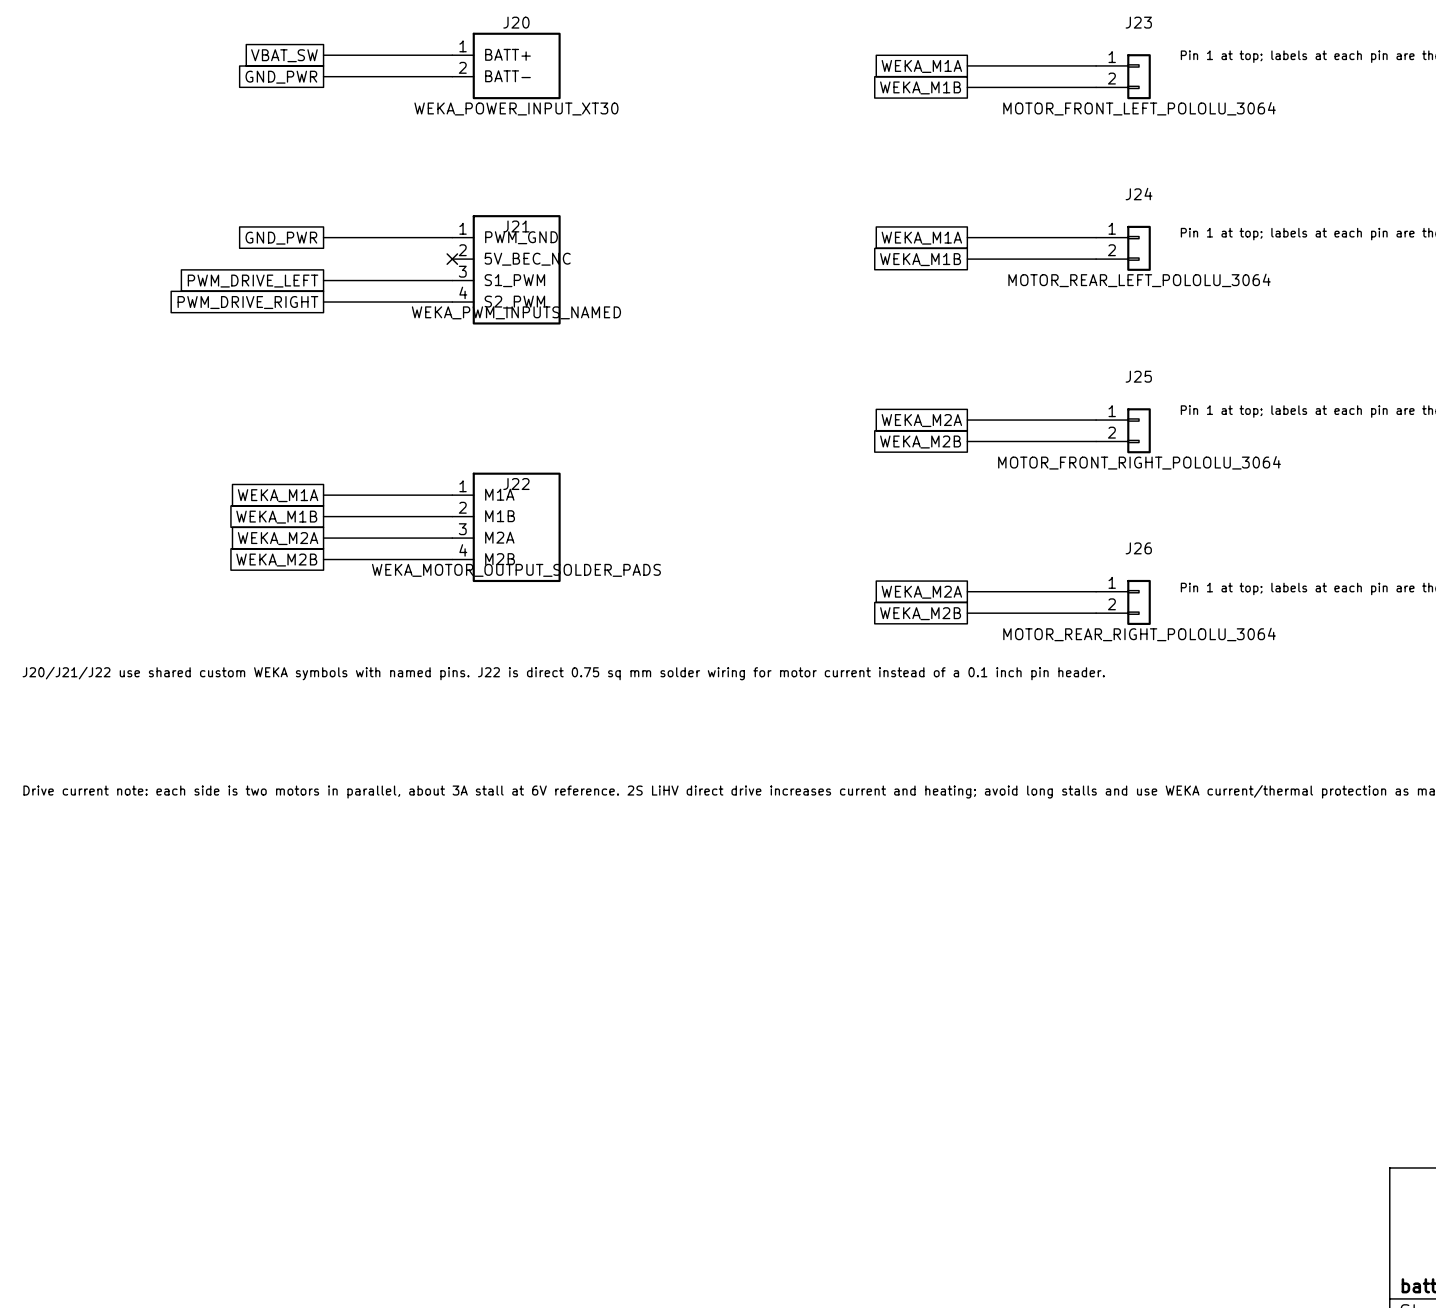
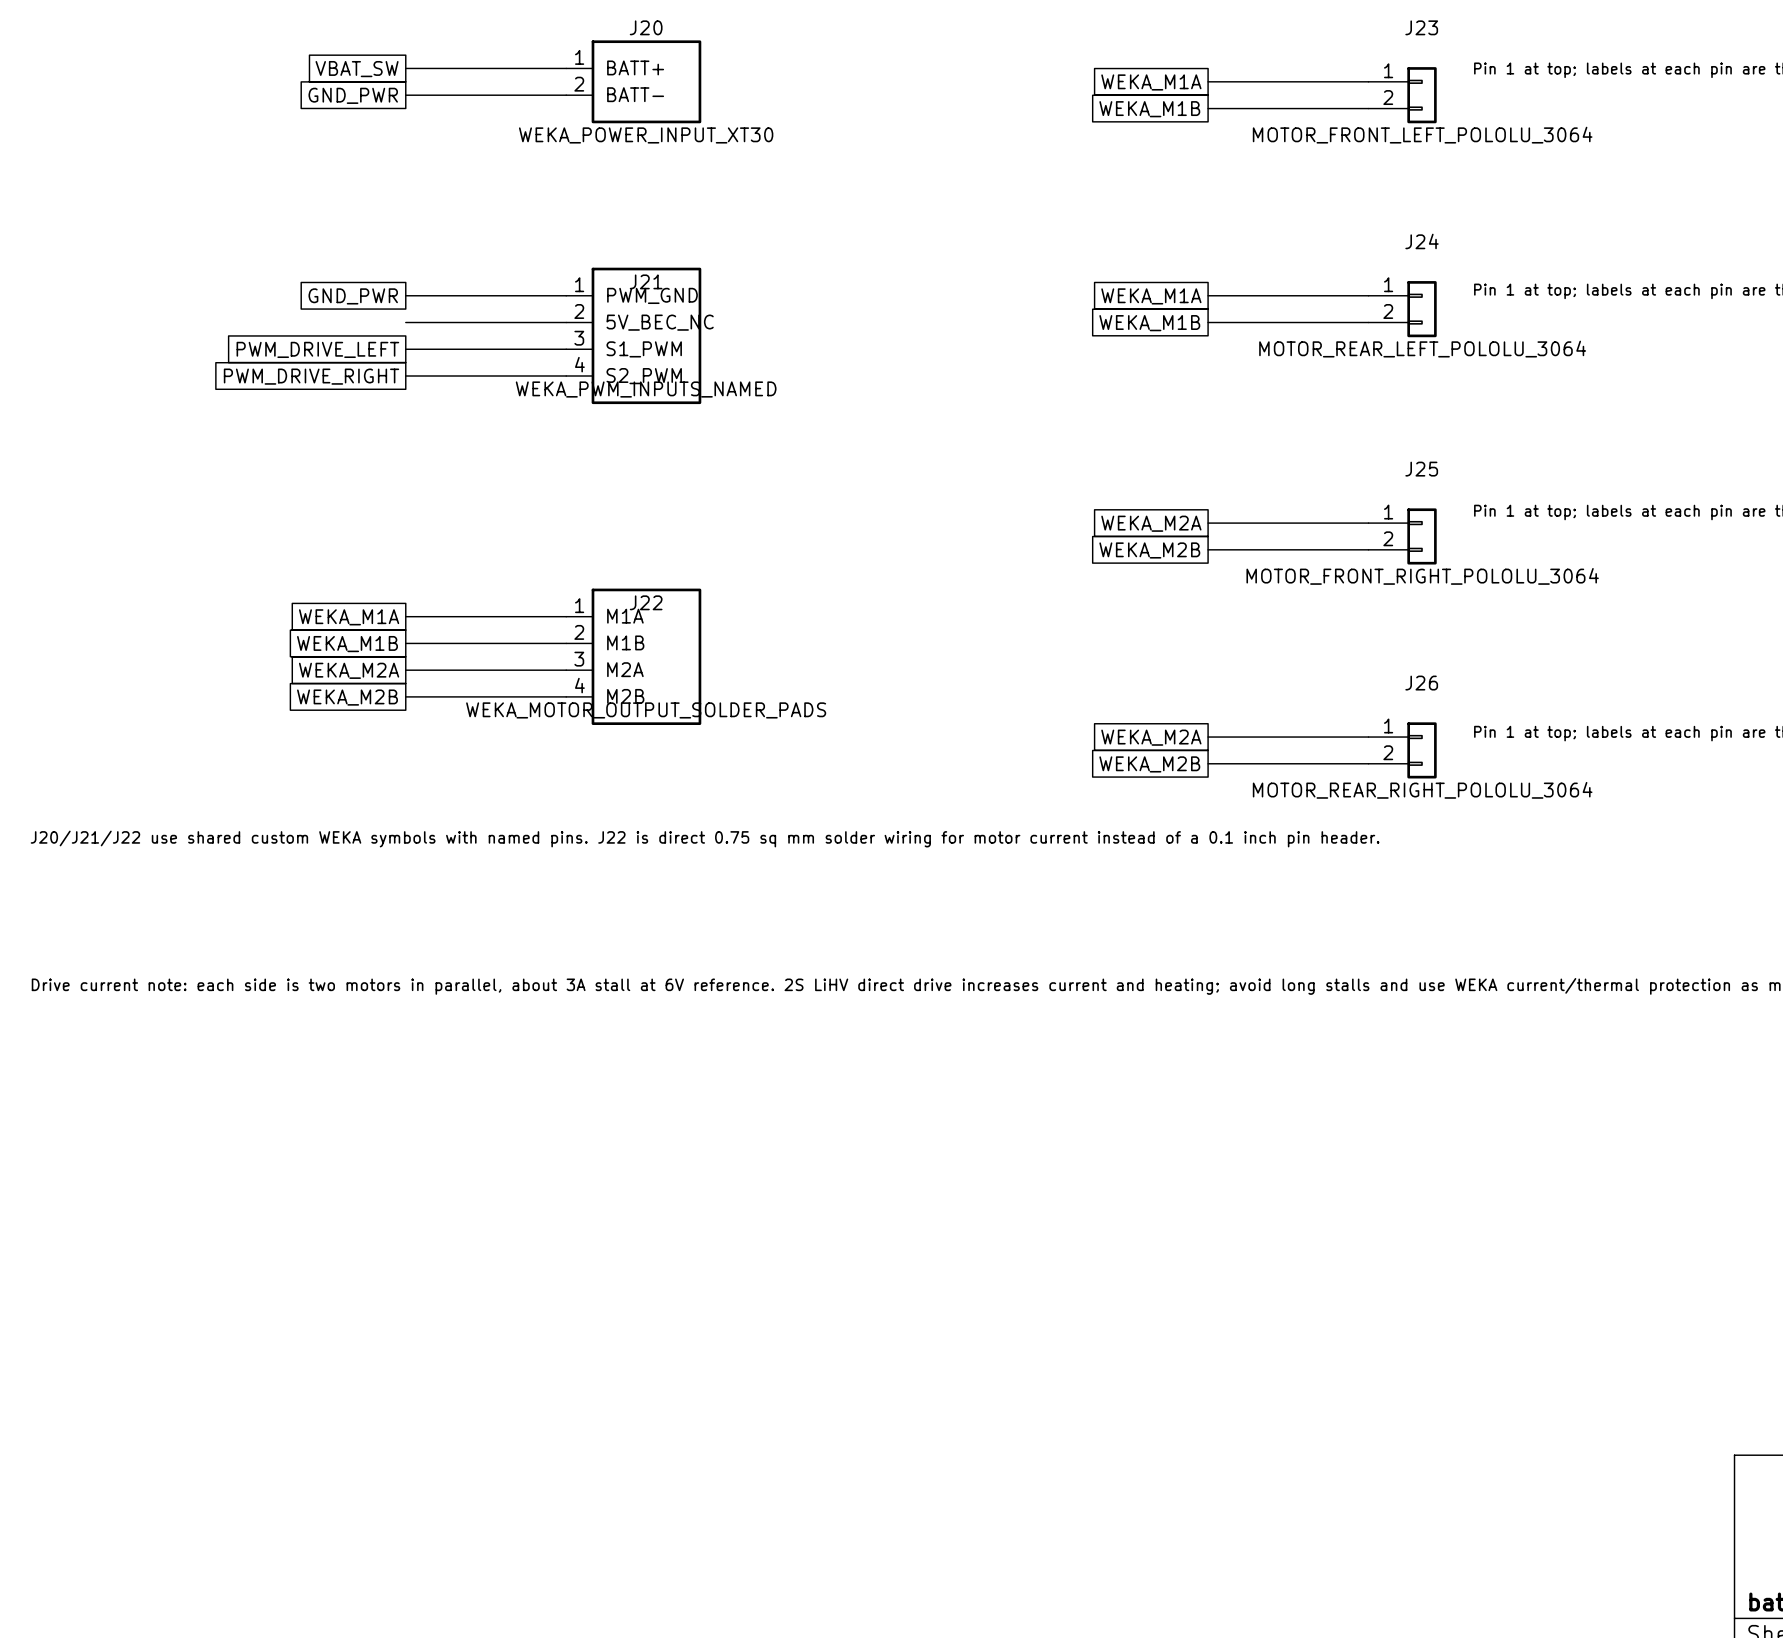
wire: none -> (405, 322) (566, 322)
no-connect mark: (452, 259) -> none

